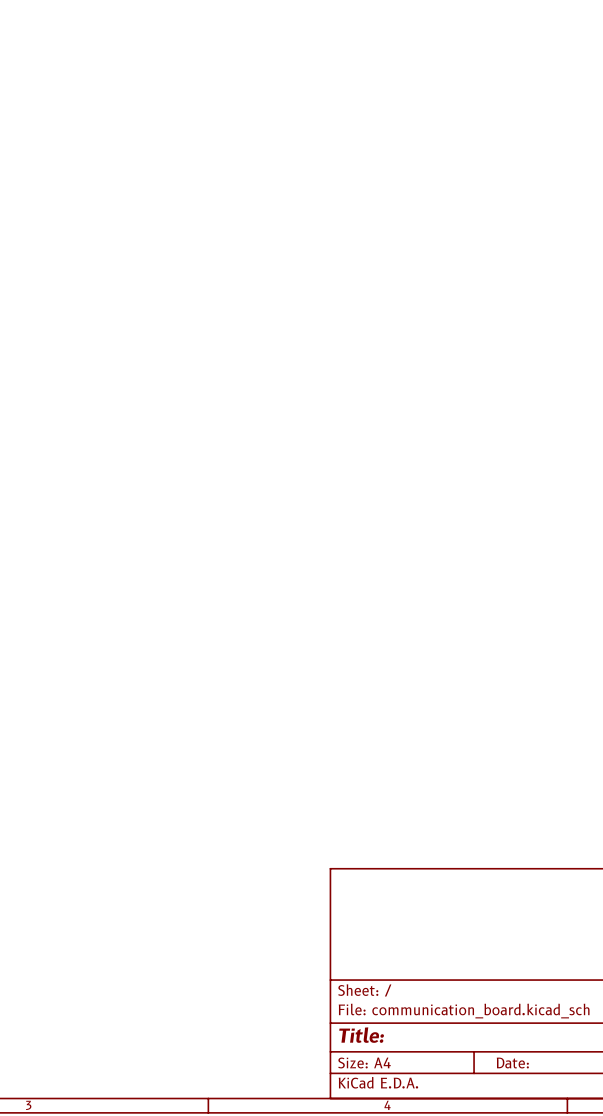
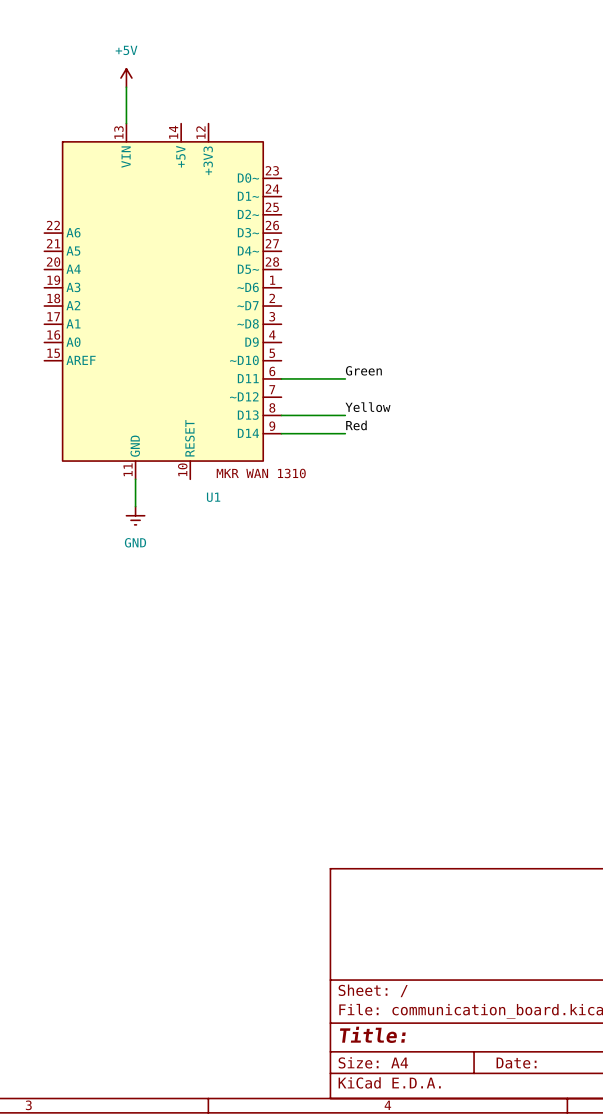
power symbol: none -> +5V (126, 78)
wire: none -> (126, 87) (126, 123)
U1: none -> (162, 301)
label: none -> Green (363, 370)
wire: none -> (281, 378) (345, 378)
label: none -> Yellow (368, 407)
wire: none -> (281, 415) (345, 415)
label: none -> Red (356, 425)
wire: none -> (281, 433) (345, 433)
wire: none -> (135, 479) (135, 506)
power symbol: none -> GND (135, 515)

